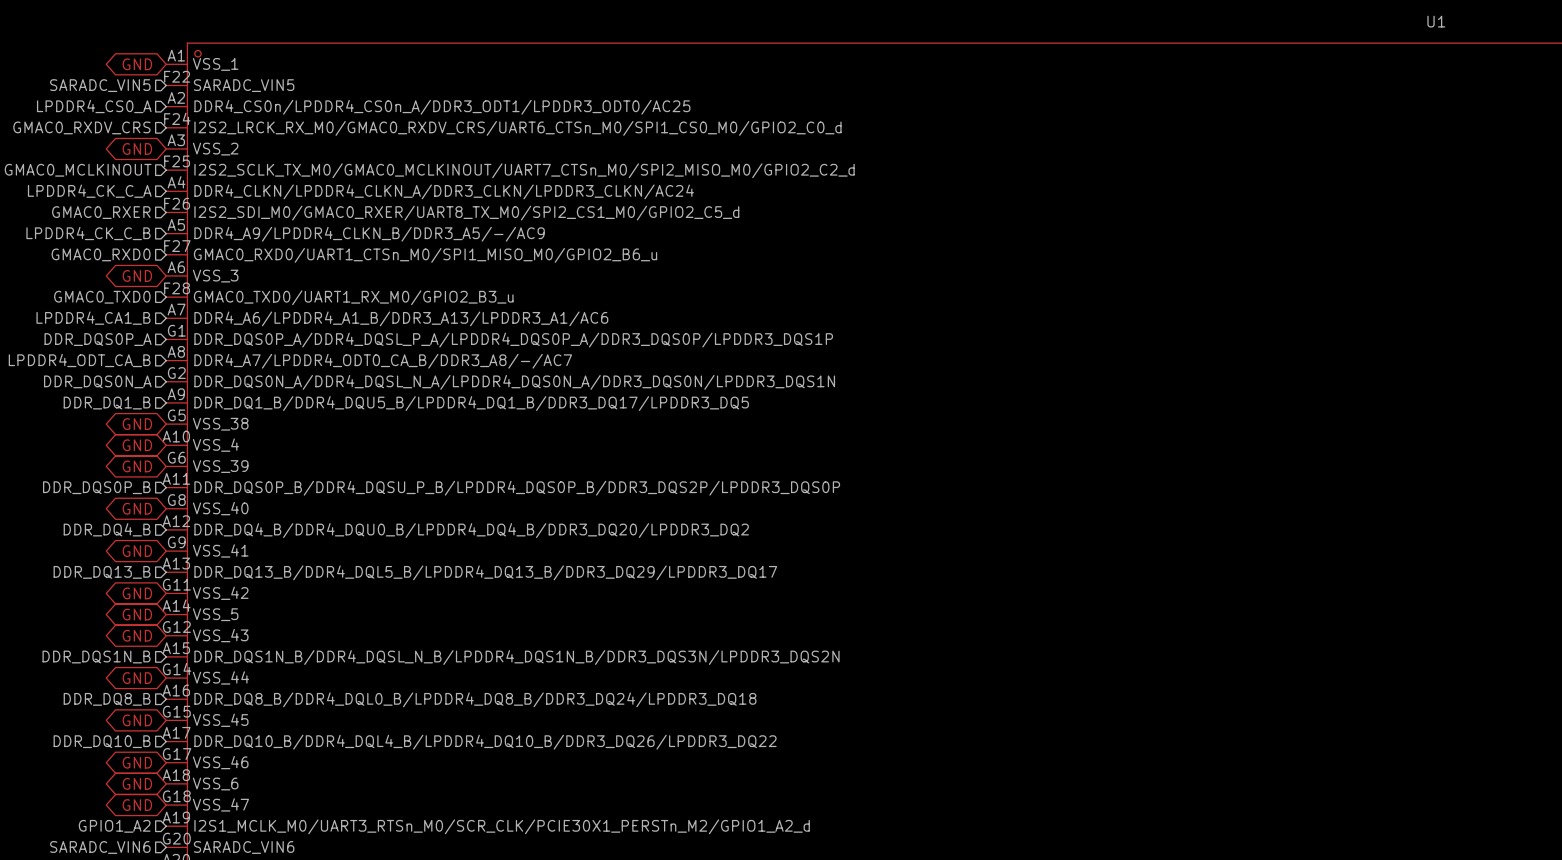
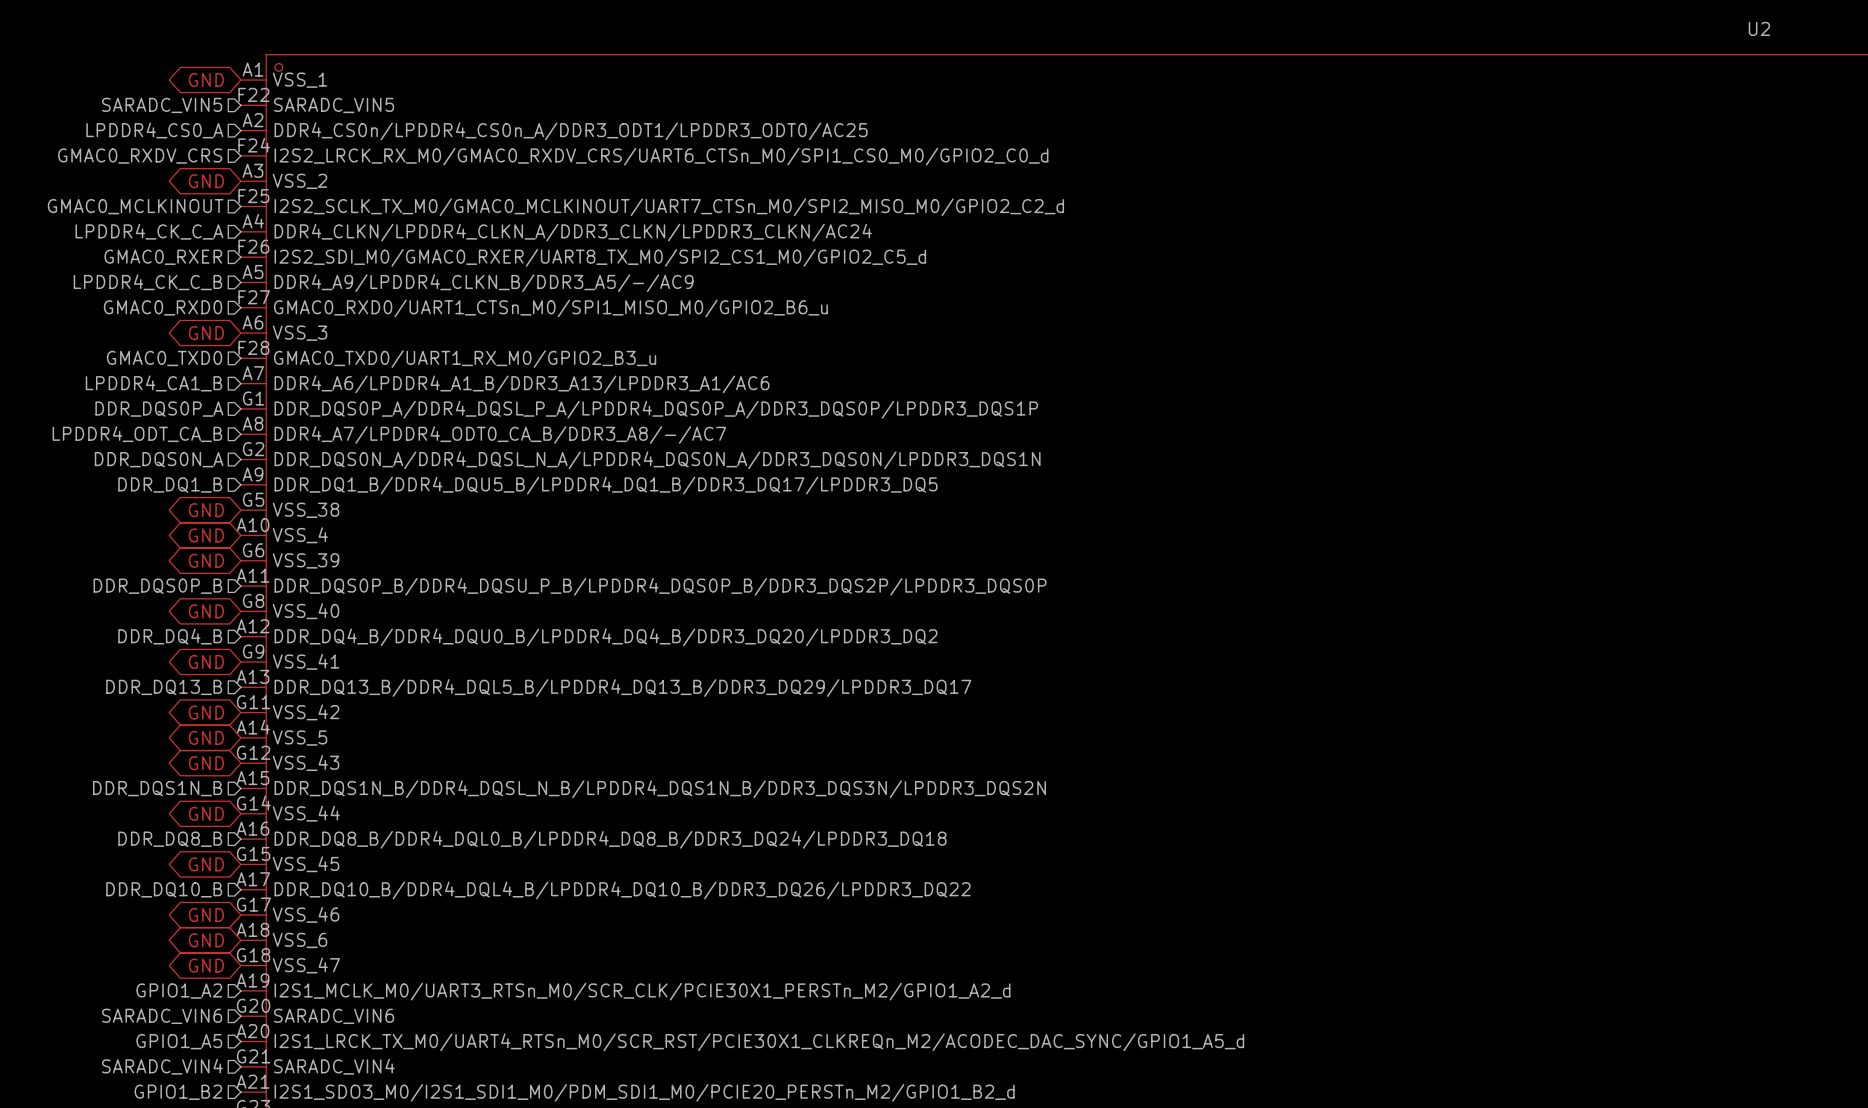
U1 name: U1 (1436, 21) -> U2 (1759, 28)

